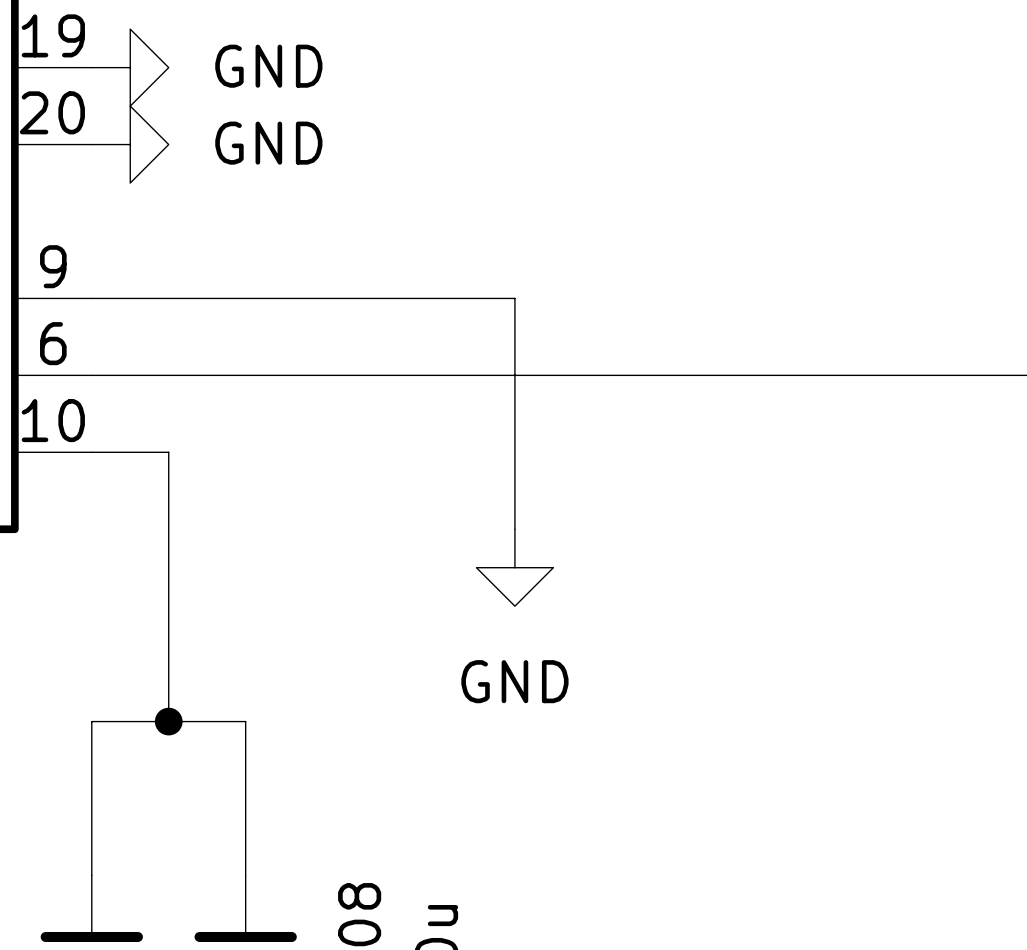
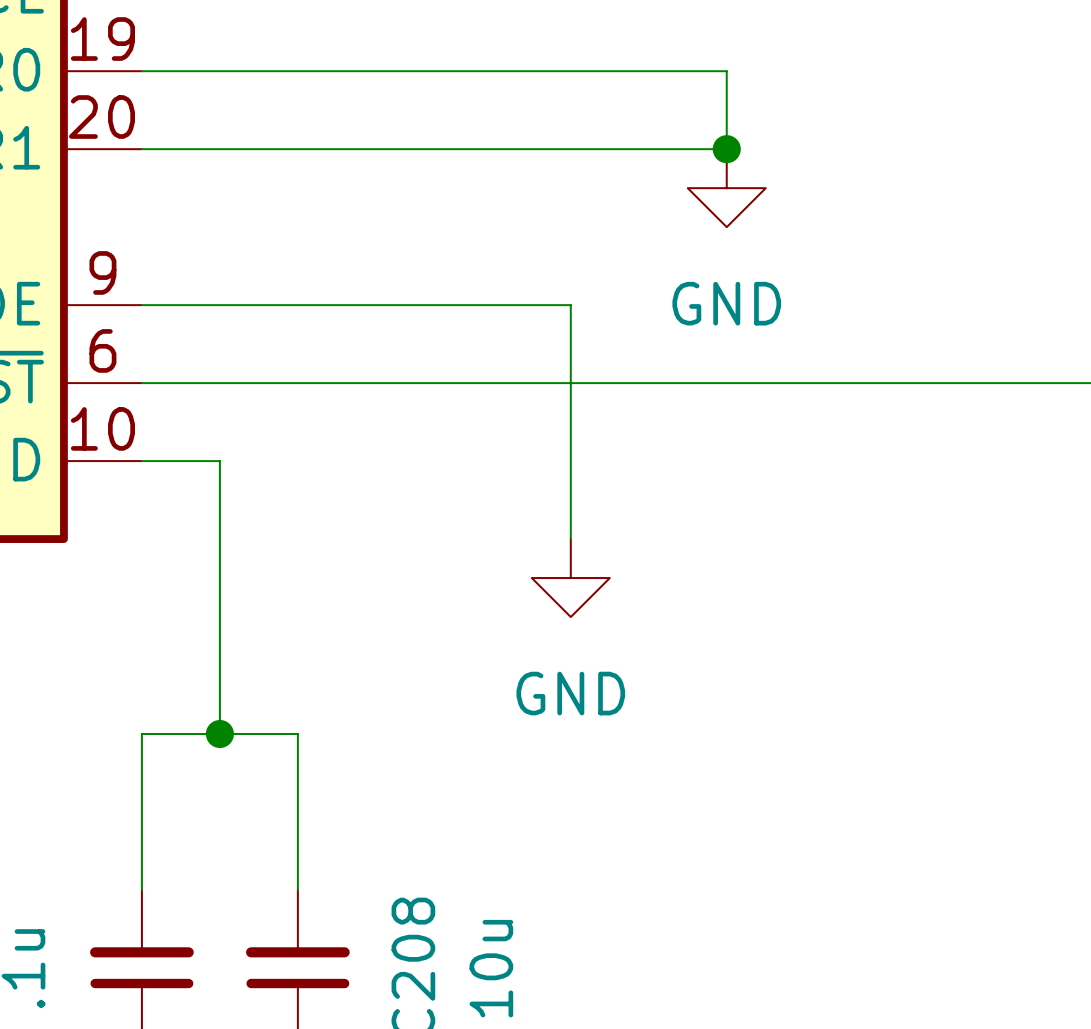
wire: none -> (141, 71) (726, 71) (726, 149) (141, 149)
power symbol: GND (130, 67) -> none
power symbol: GND (130, 144) -> none
junction: none -> (726, 149)
power symbol: none -> GND (726, 188)

